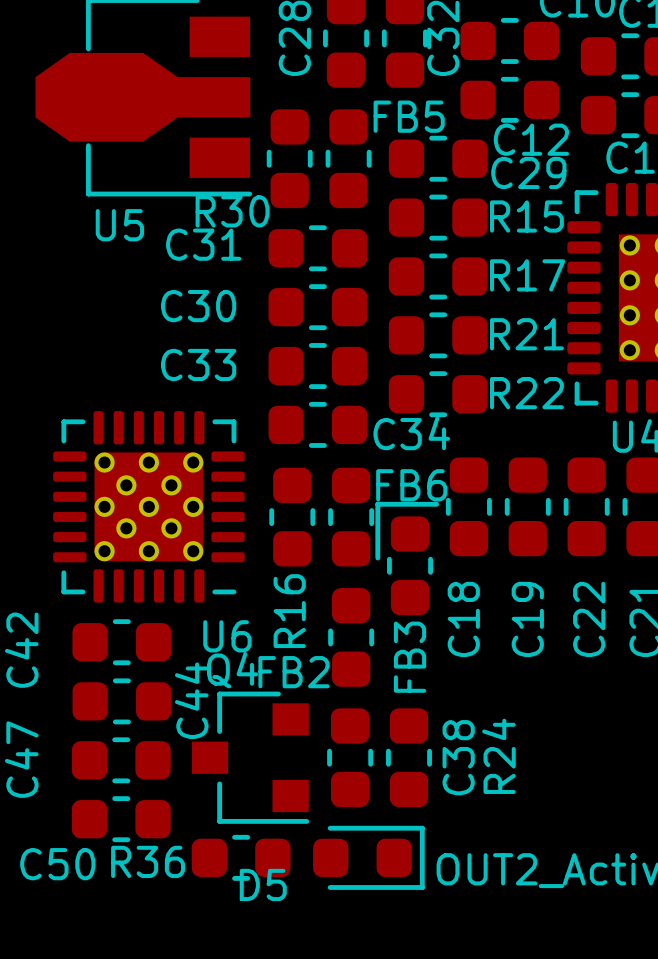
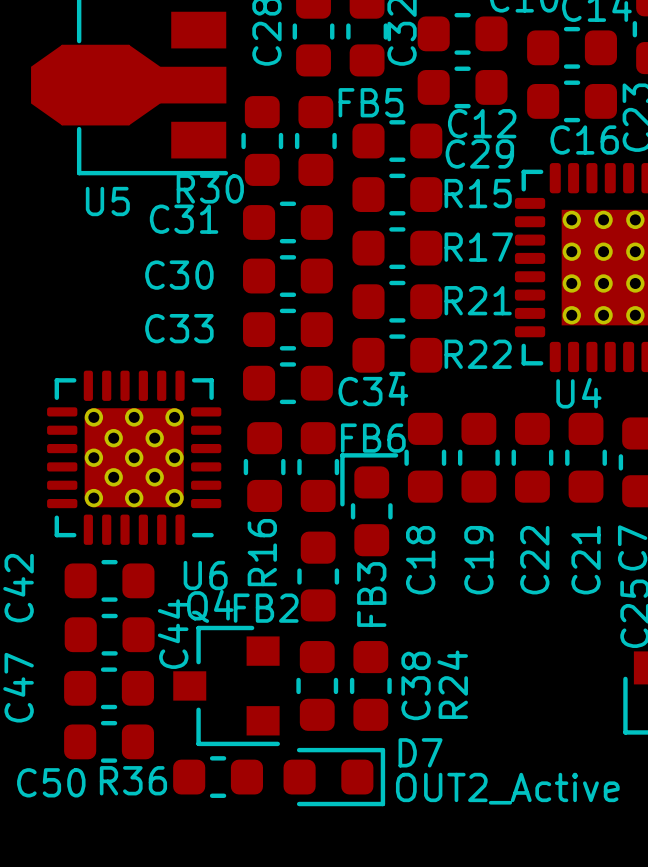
D5 name: D5 (263, 884) -> D7 (420, 752)

